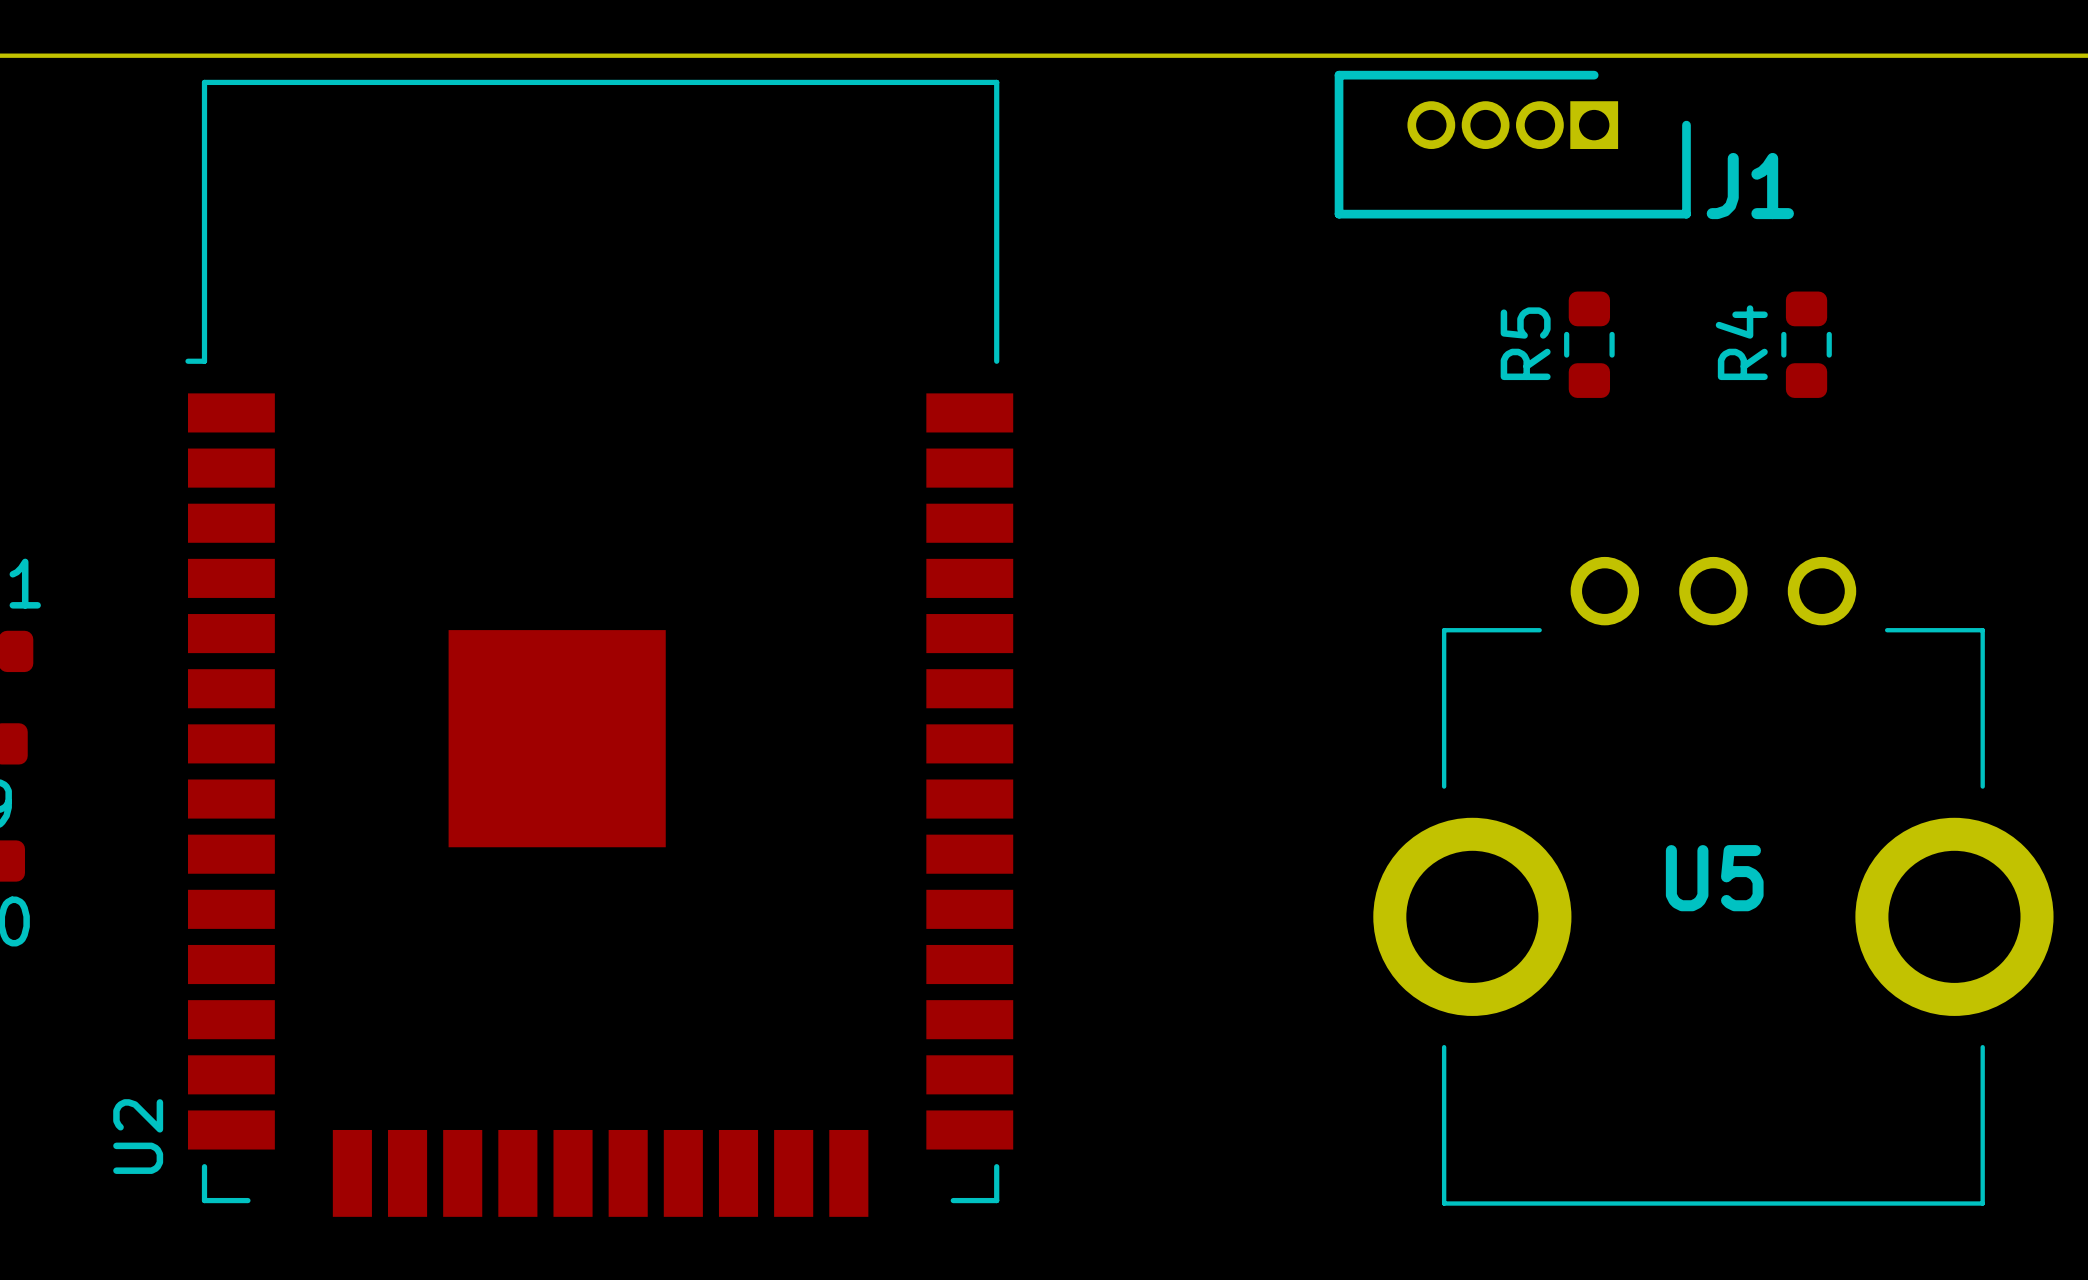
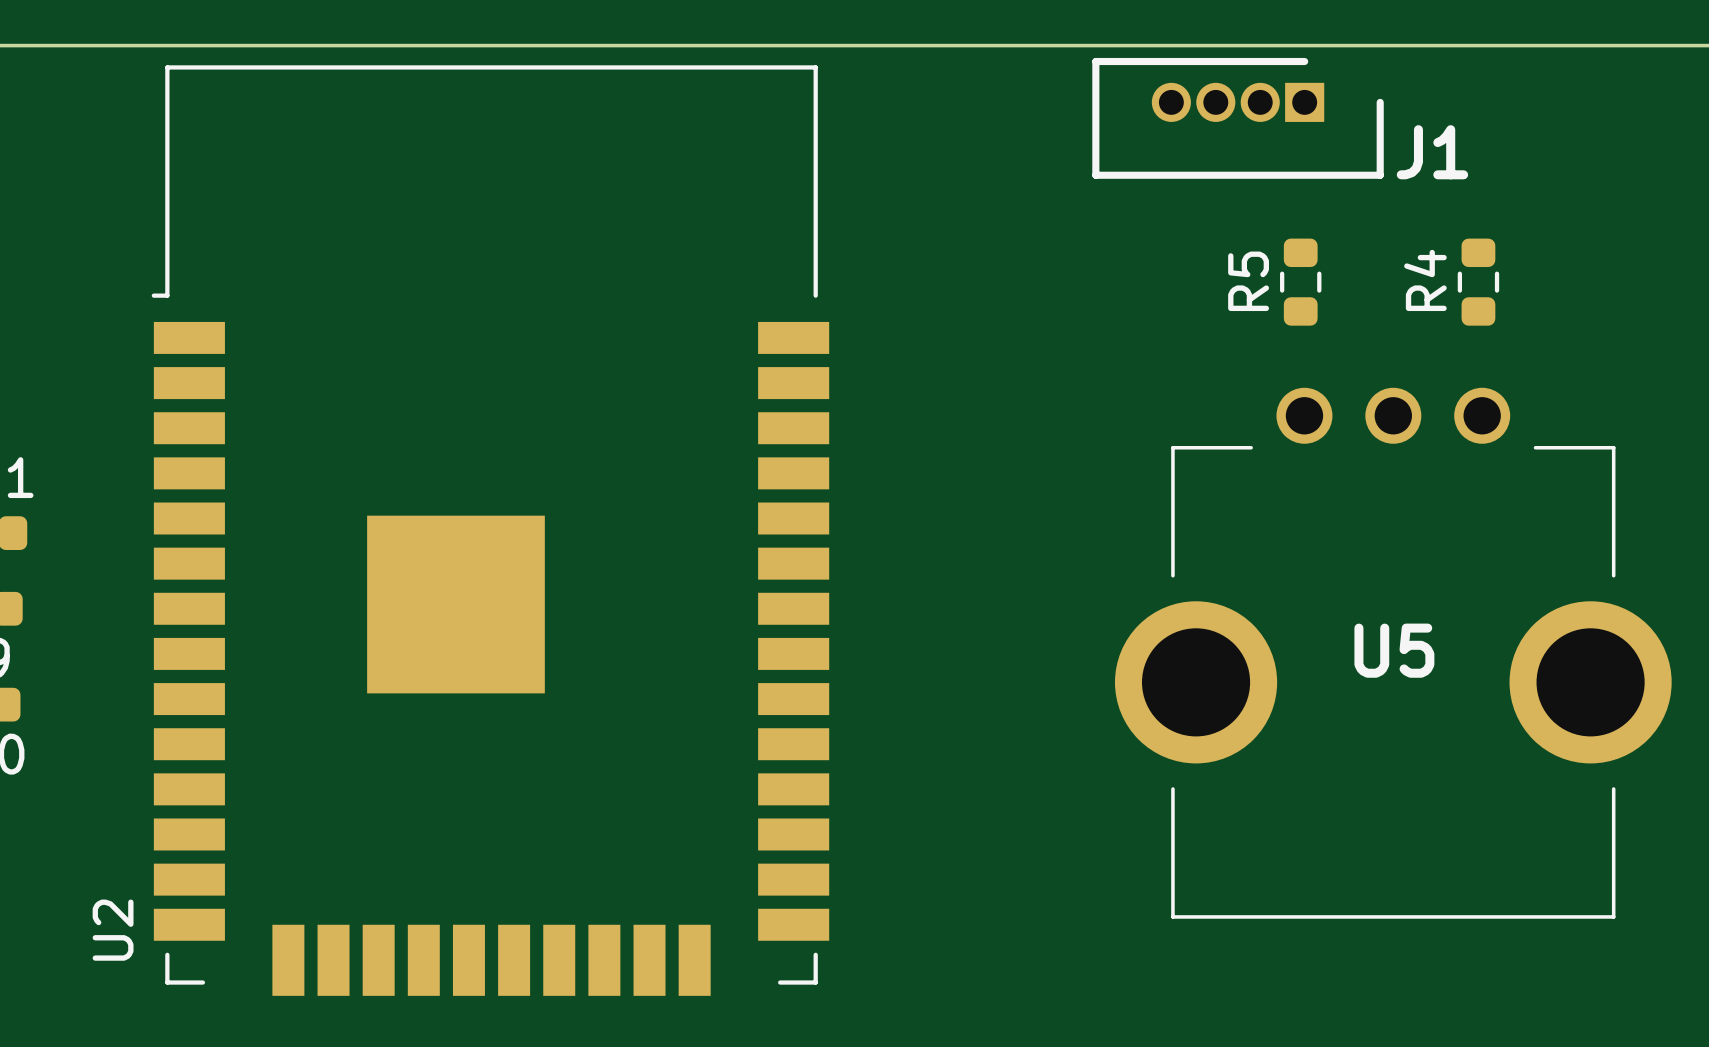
U5 position: (1713, 881) -> (1393, 653)

